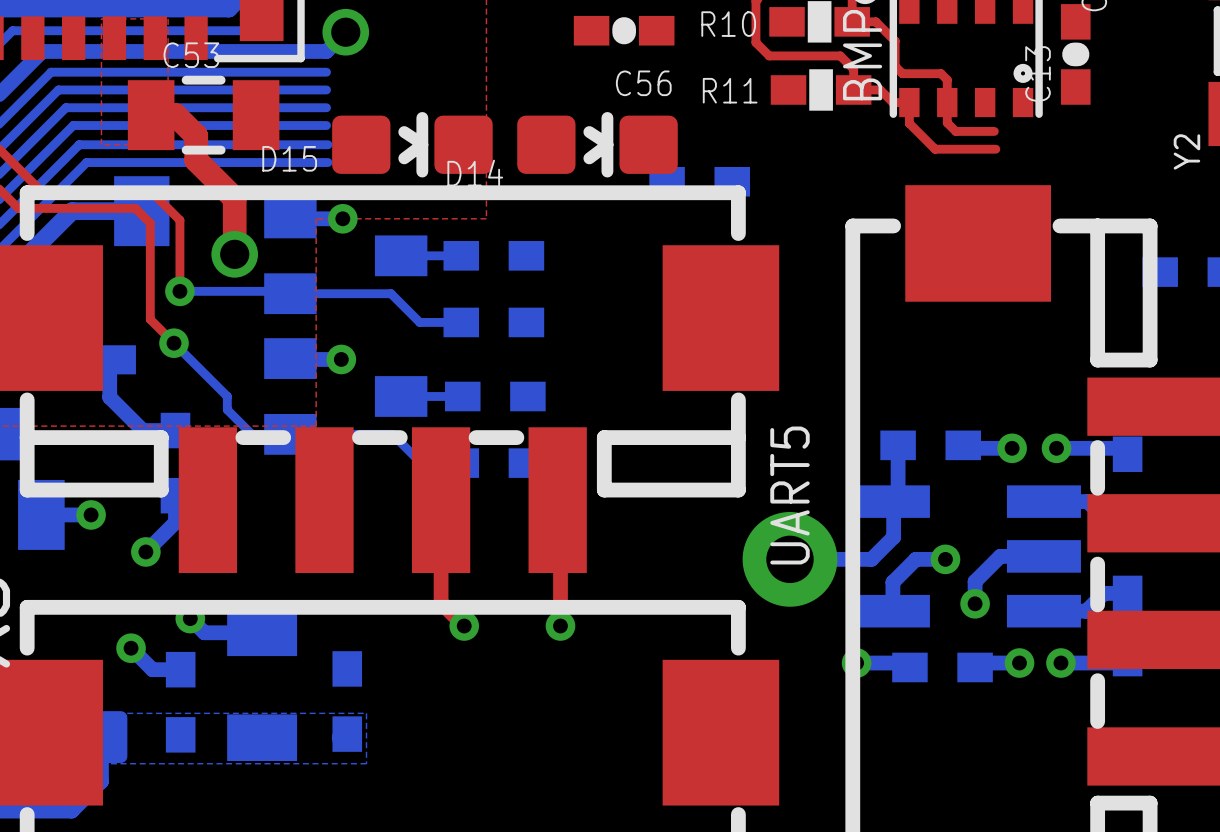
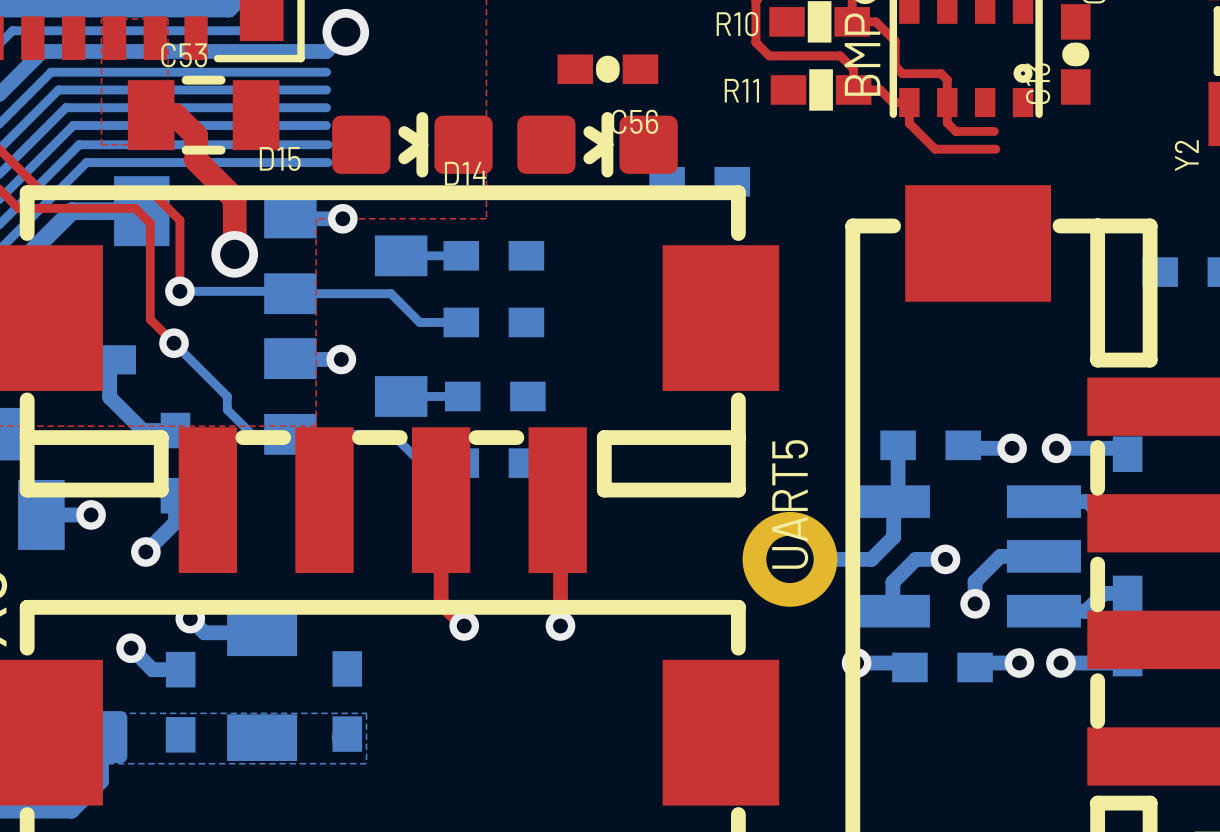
C56 position: (624, 30) -> (607, 69)

